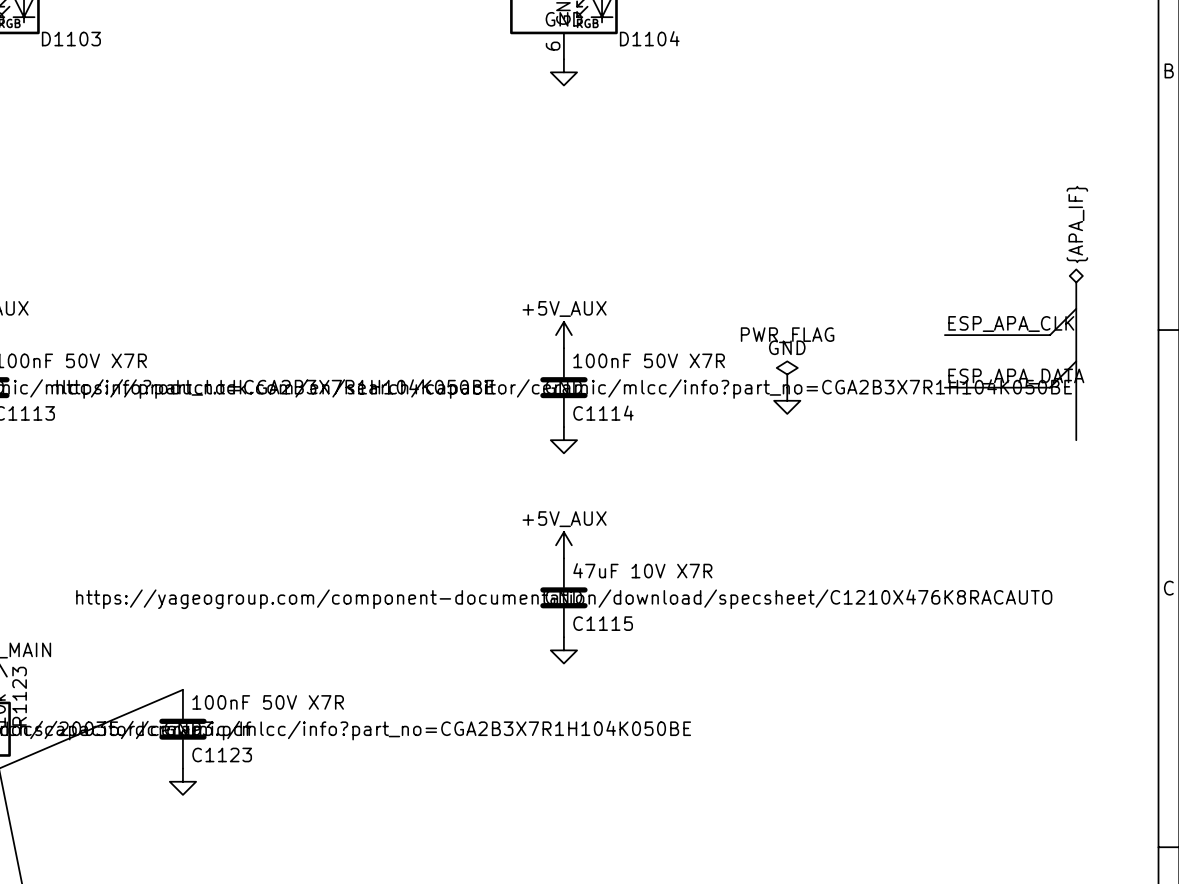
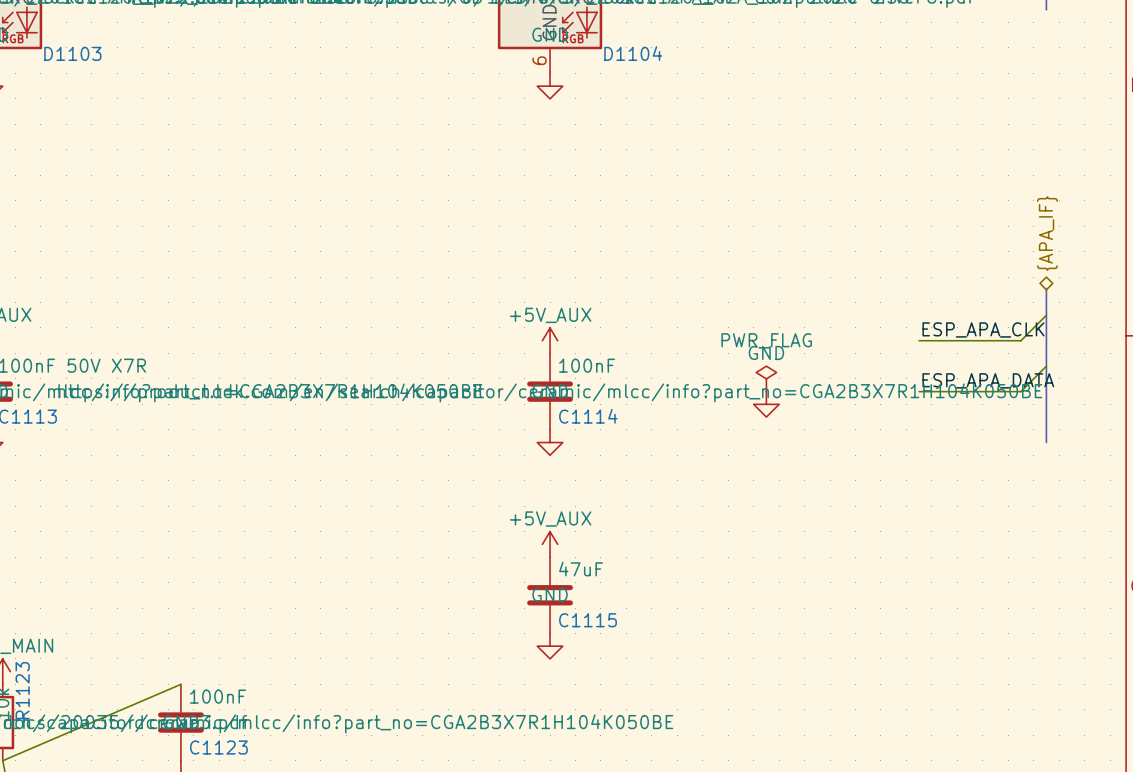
C1114 value: 100nF 50V X7R (649, 360) -> 100nF (587, 365)
C1115 value: 47uF 10V X7R (642, 570) -> 47uF (581, 569)
C1115 text: https://yageogroup.com/component-documentation/download/specsheet/C1210X476K8RACAUTO (564, 599) -> none
C1123 value: 100nF 50V X7R (268, 702) -> 100nF (218, 696)

